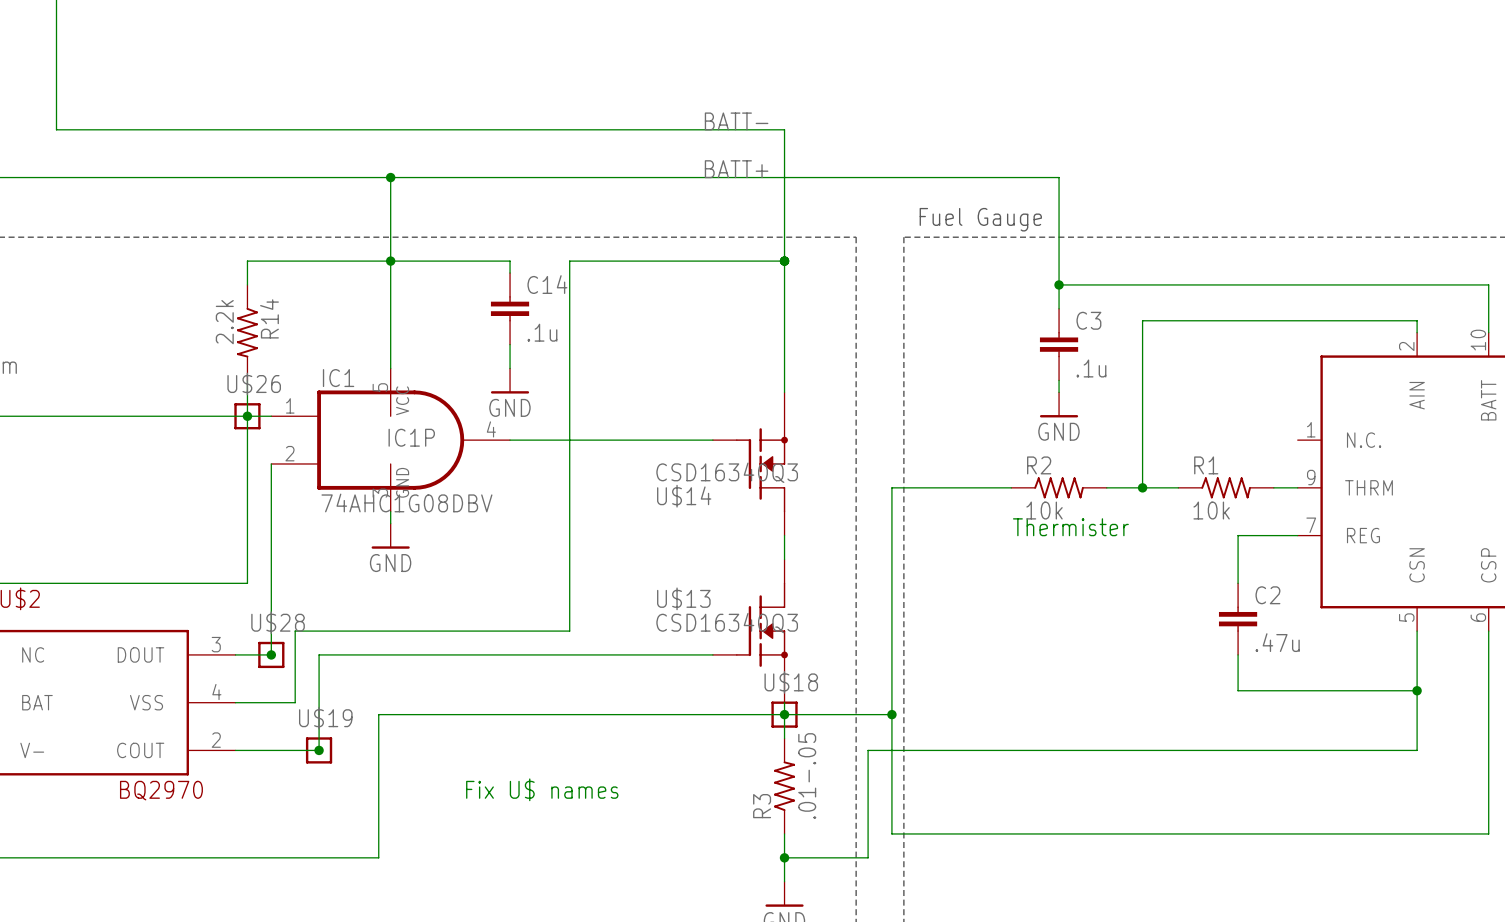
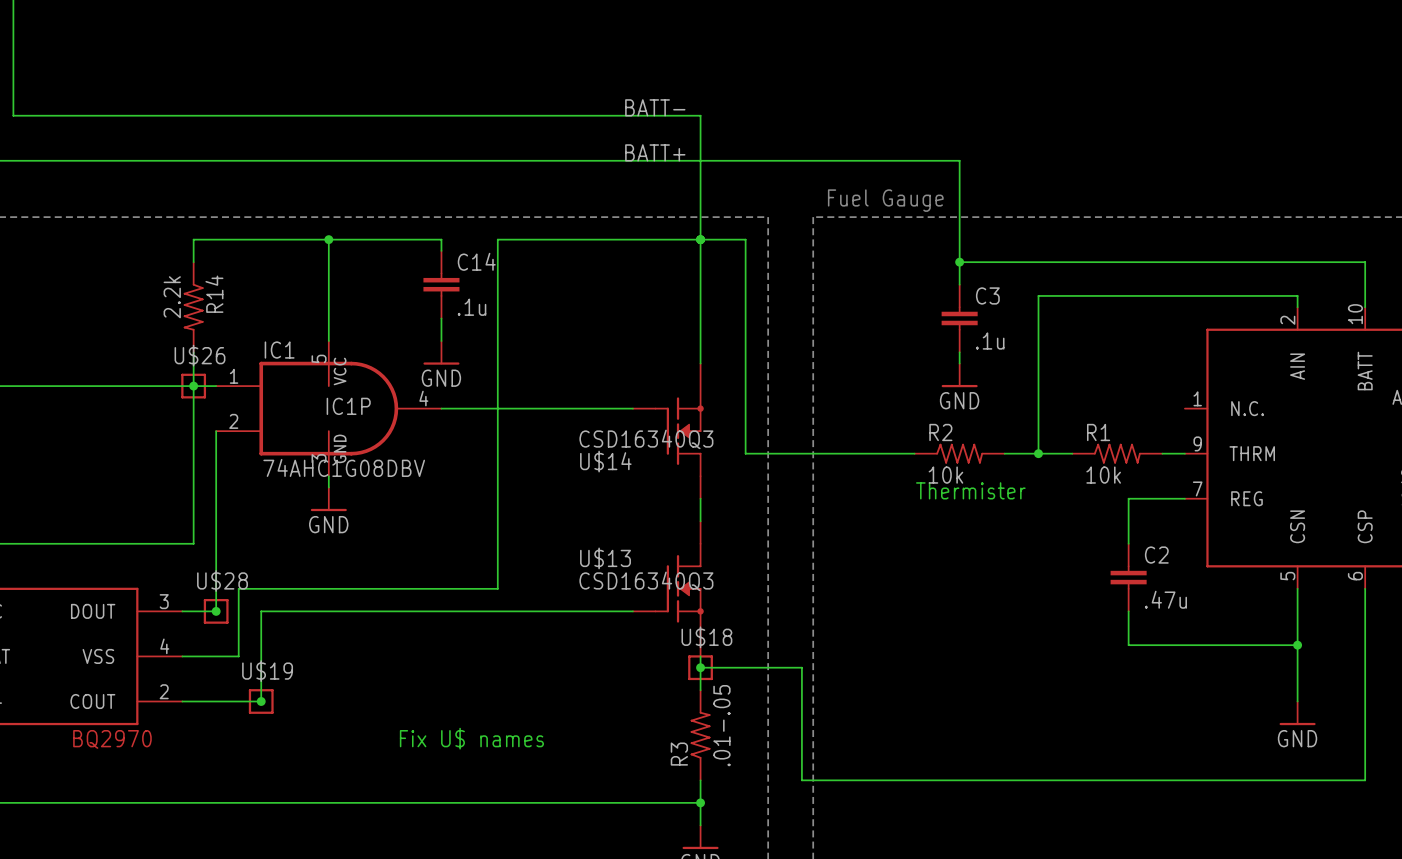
wire: (390, 177) (390, 261) -> none
junction: (390, 177) -> none
wire: (891, 487) (891, 714) -> (801, 453) (745, 453) (745, 239) (700, 239)
wire: (784, 714) (378, 714) (378, 857) -> (700, 802) (317, 802)
junction: (891, 714) -> none
wire: (1417, 750) (868, 750) (868, 857) (784, 857) -> none
power symbol: none -> GND (1297, 713)

